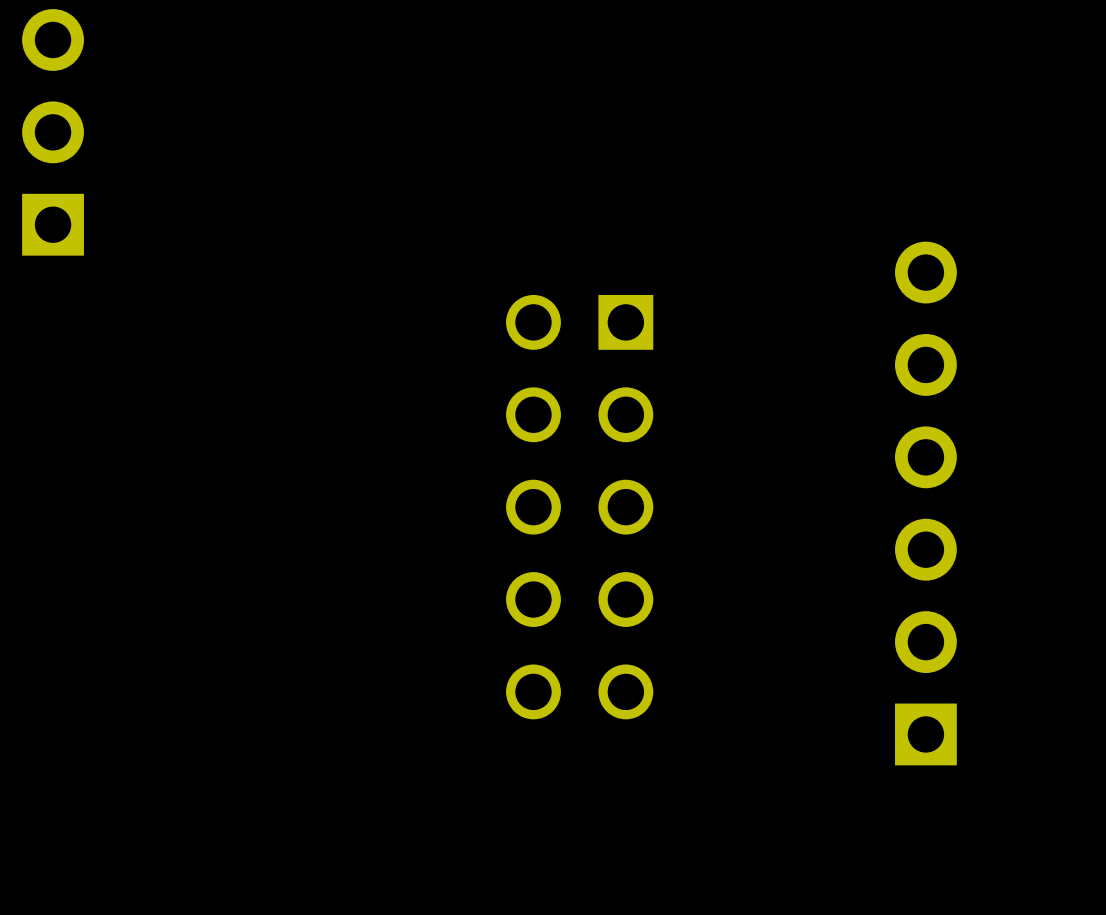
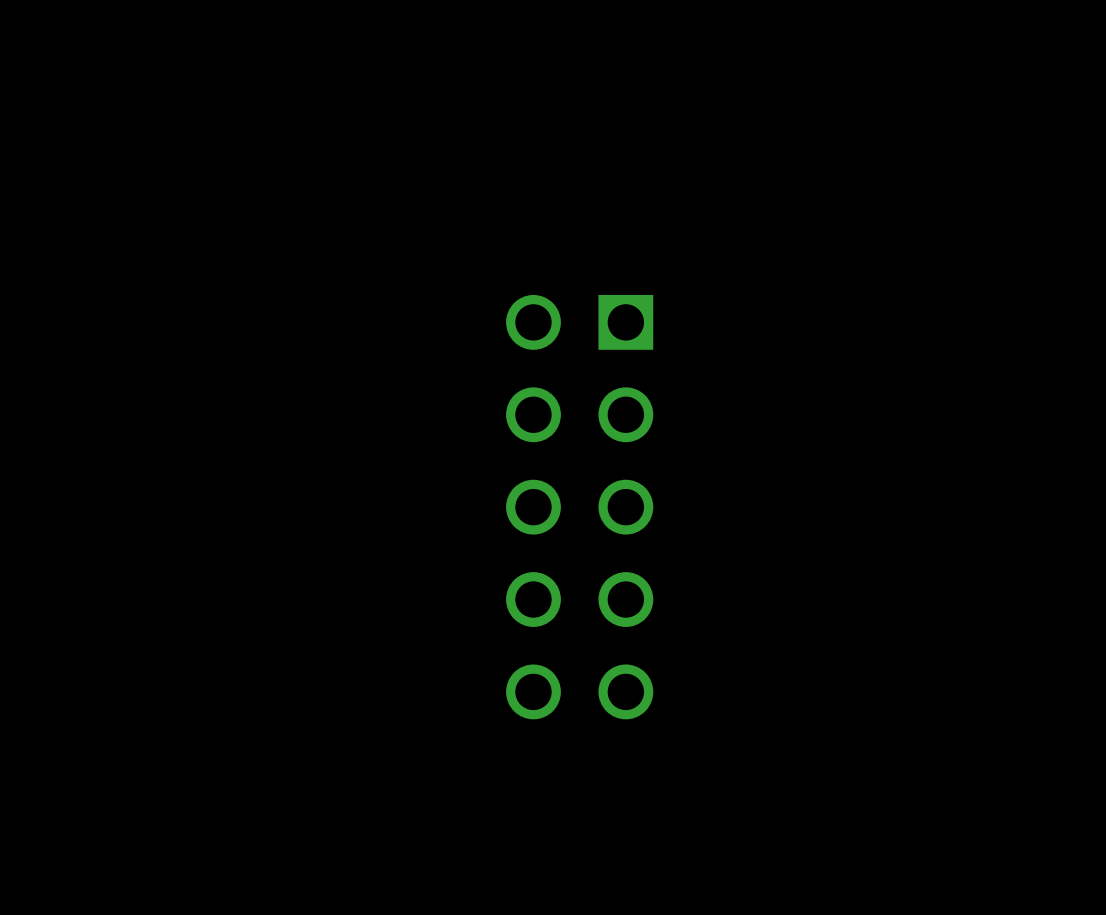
part: (53, 132) -> none
part: (925, 503) -> none

